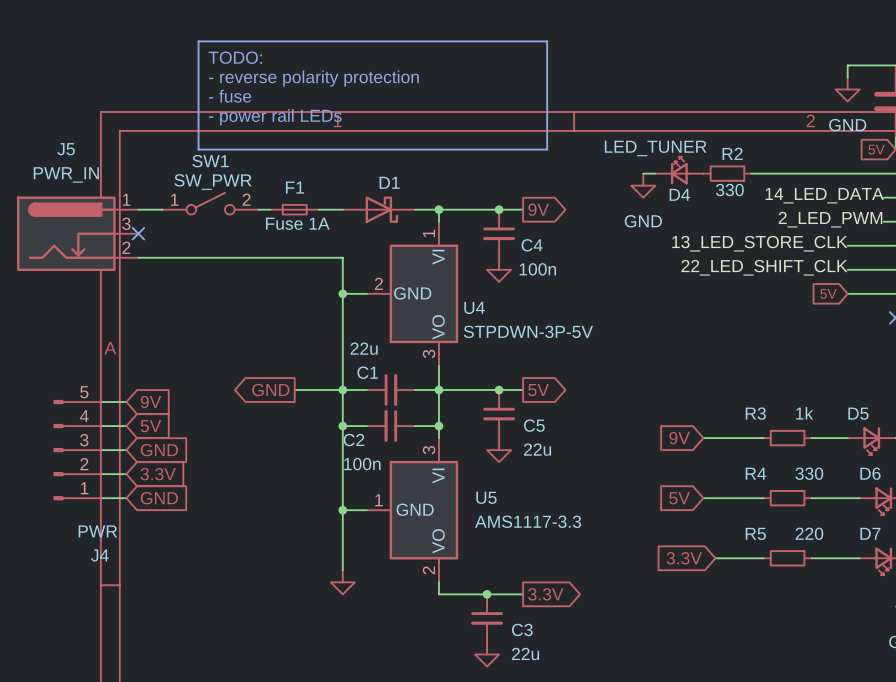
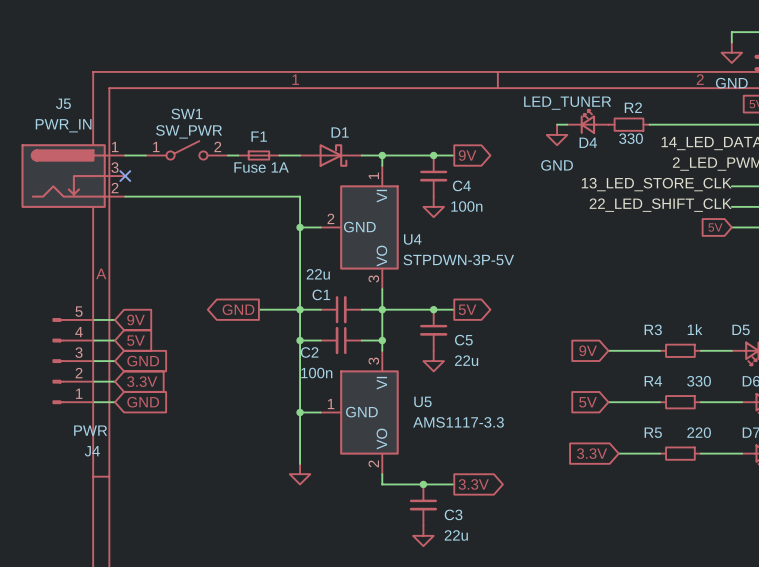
line: (198, 41) (547, 41) (547, 149) (198, 149) (198, 41) -> none
text: TODO: (235, 57) -> none
text: - reverse polarity protection (313, 78) -> none
text: - fuse (230, 96) -> none
text: - power rail LEDs (275, 117) -> none

